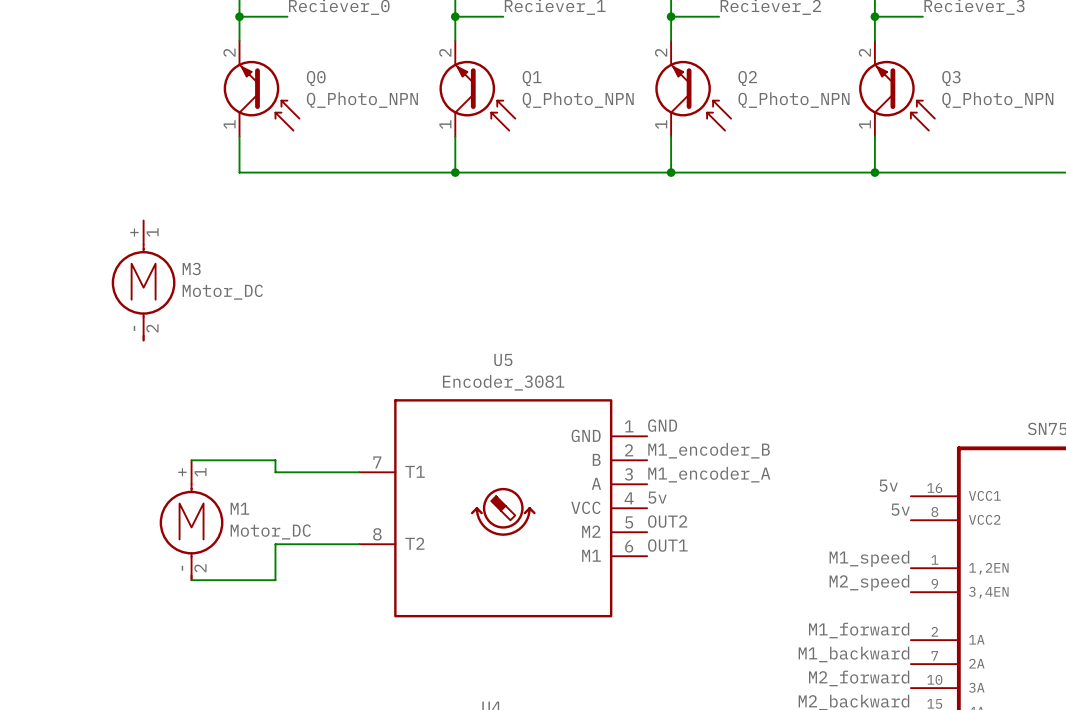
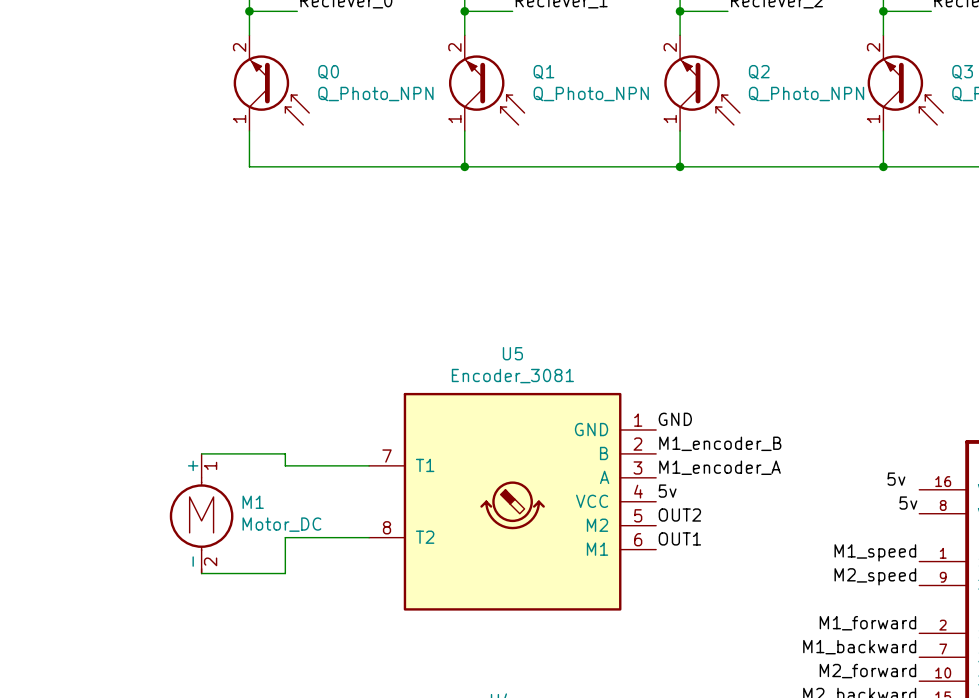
M3: Motor_DC (143, 280) -> none

